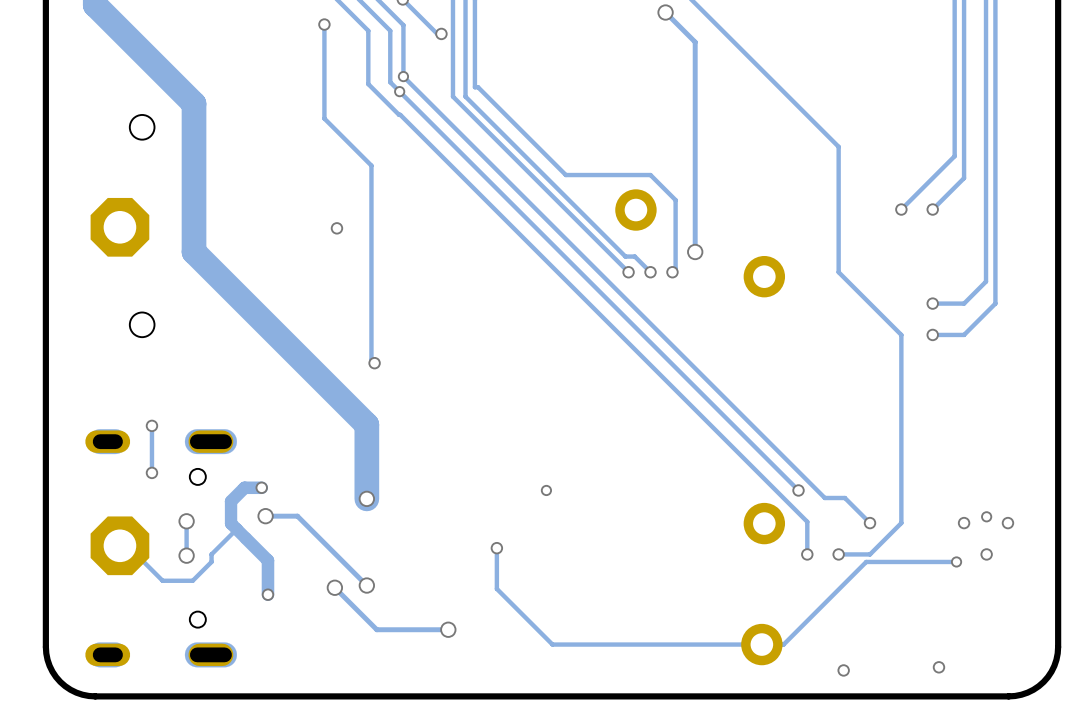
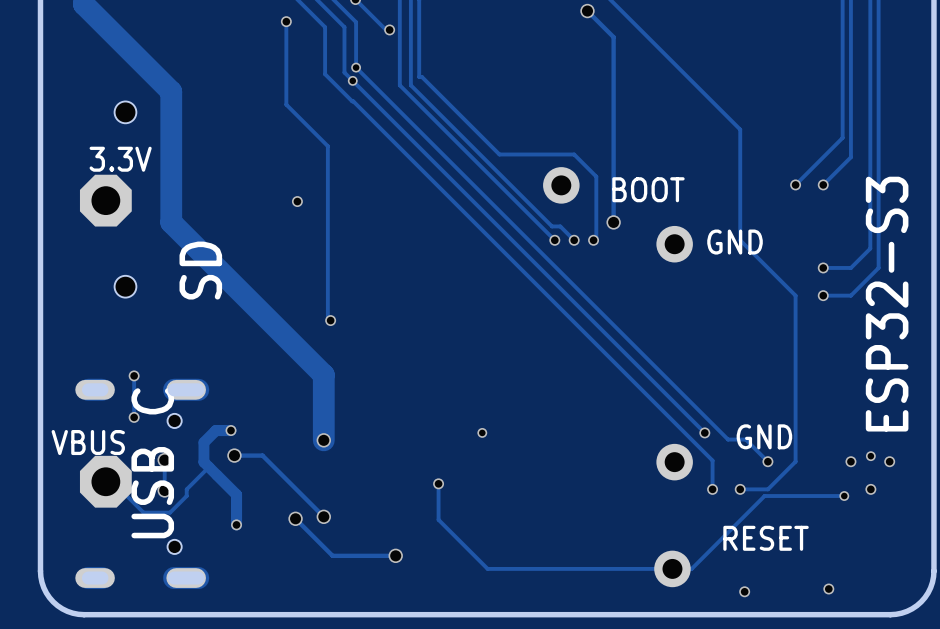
text: none -> 3.3V (120, 159)
text: none -> BOOT (648, 189)
text: none -> GND (735, 242)
text: none -> SD (200, 270)
text: none -> ESP32-S3 (887, 304)
text: none -> GND (764, 436)
text: none -> VBUS (88, 442)
text: none -> USB C (152, 463)
text: none -> RESET (766, 538)

